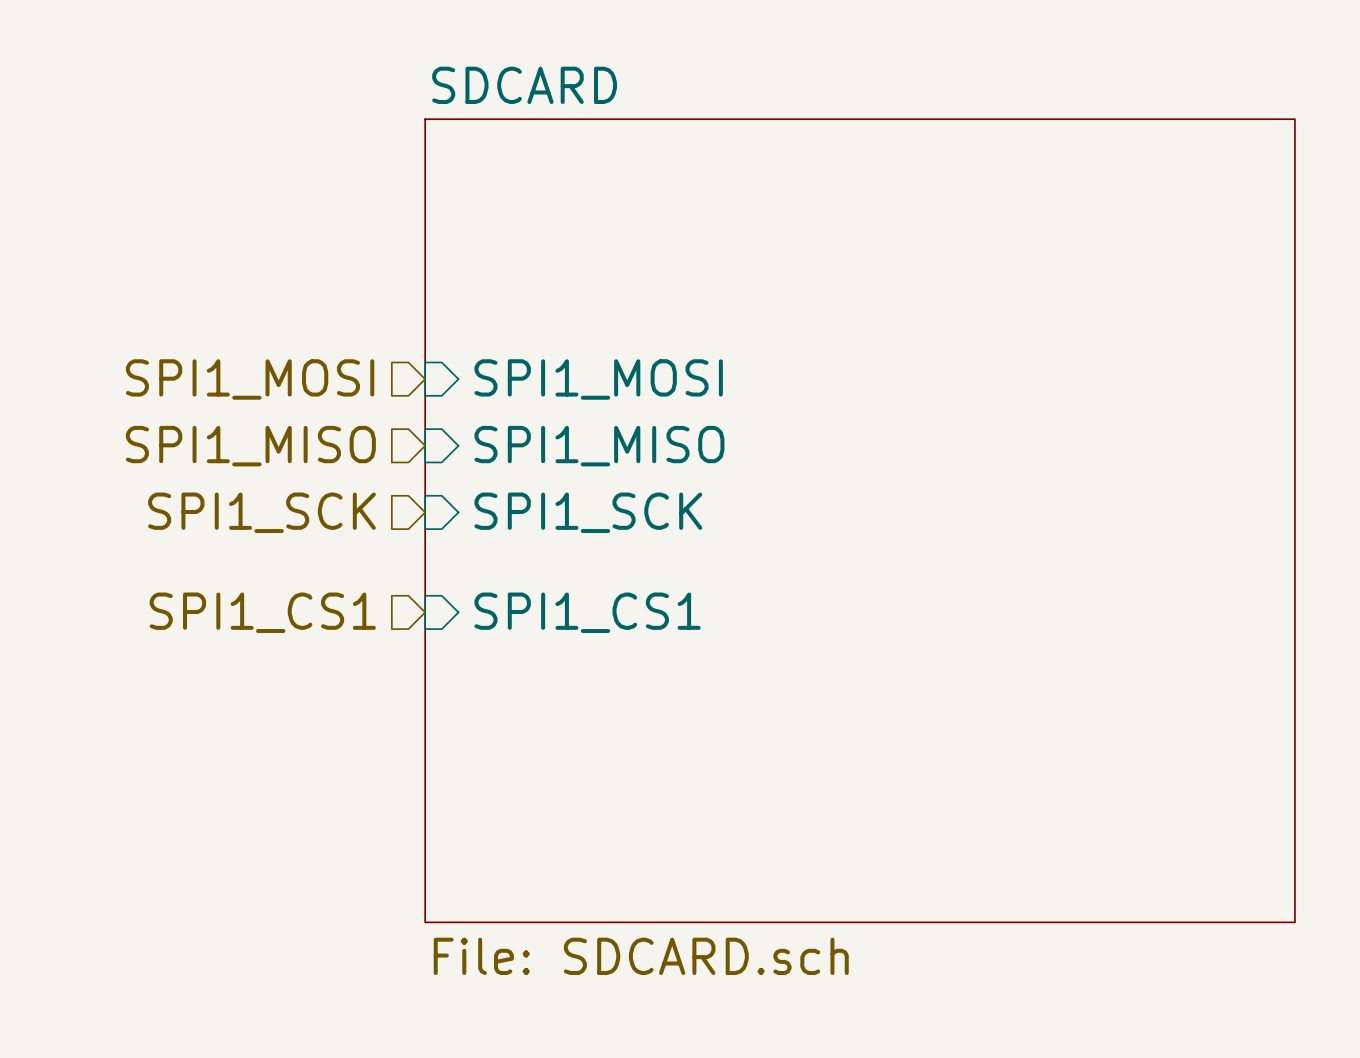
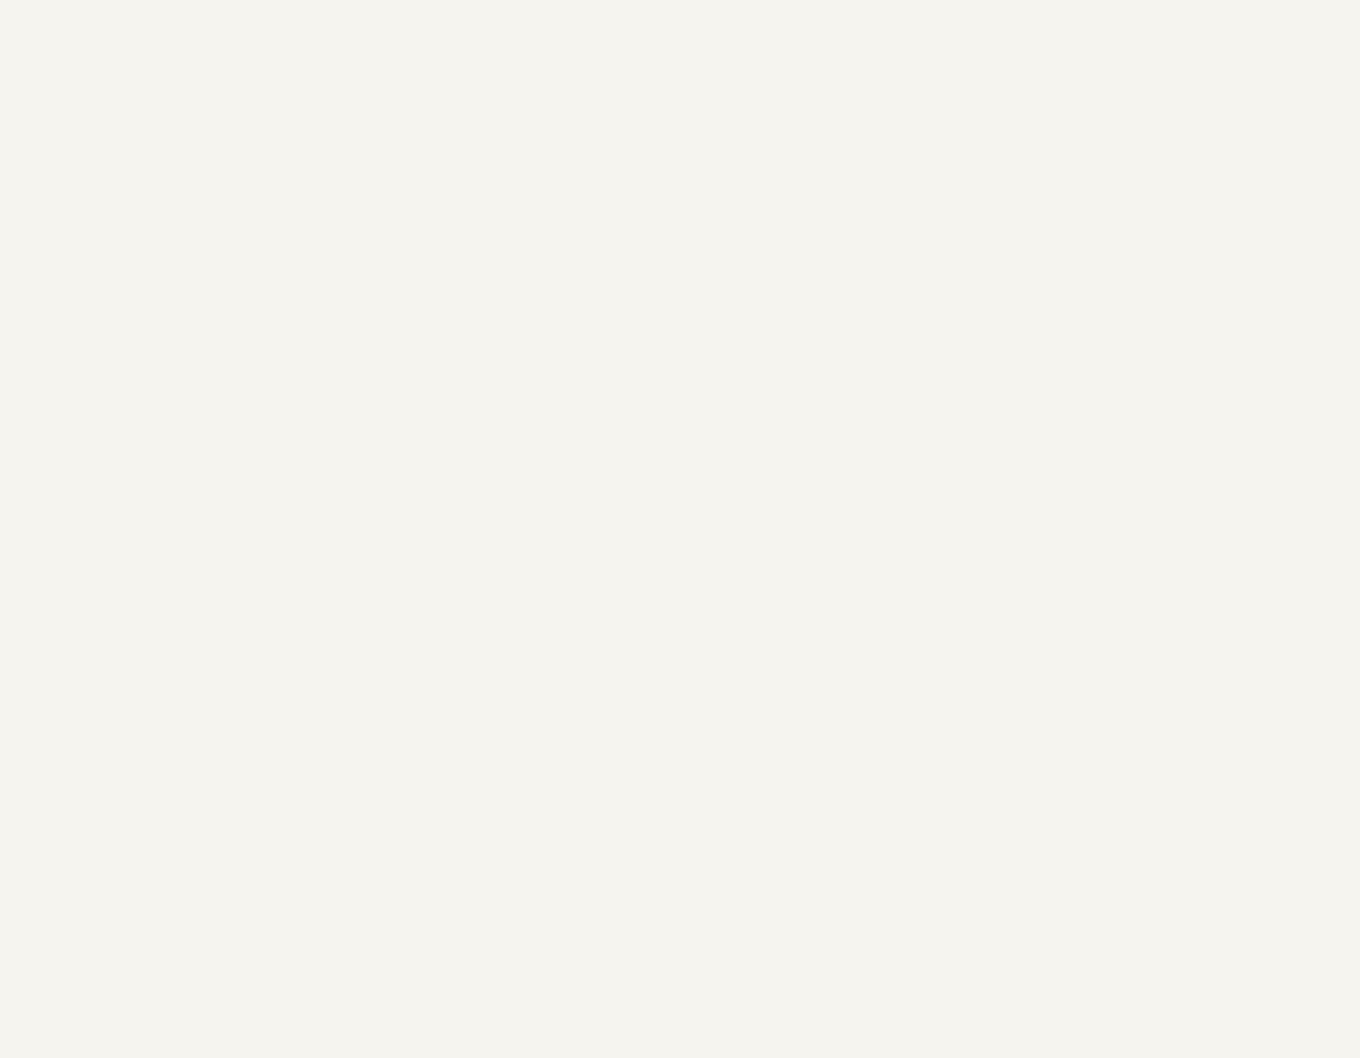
hierarchical label: SPI1_MOSI (250, 379) -> none
sheet pin: SPI1_MOSI (598, 379) -> none
hierarchical label: SPI1_MISO (250, 446) -> none
sheet pin: SPI1_MISO (599, 446) -> none
hierarchical label: SPI1_SCK (261, 512) -> none
sheet pin: SPI1_SCK (588, 512) -> none
sheet SDCARD: File: SDCARD.sch (860, 520) -> none
hierarchical label: SPI1_CS1 (262, 612) -> none
sheet pin: SPI1_CS1 (587, 612) -> none

